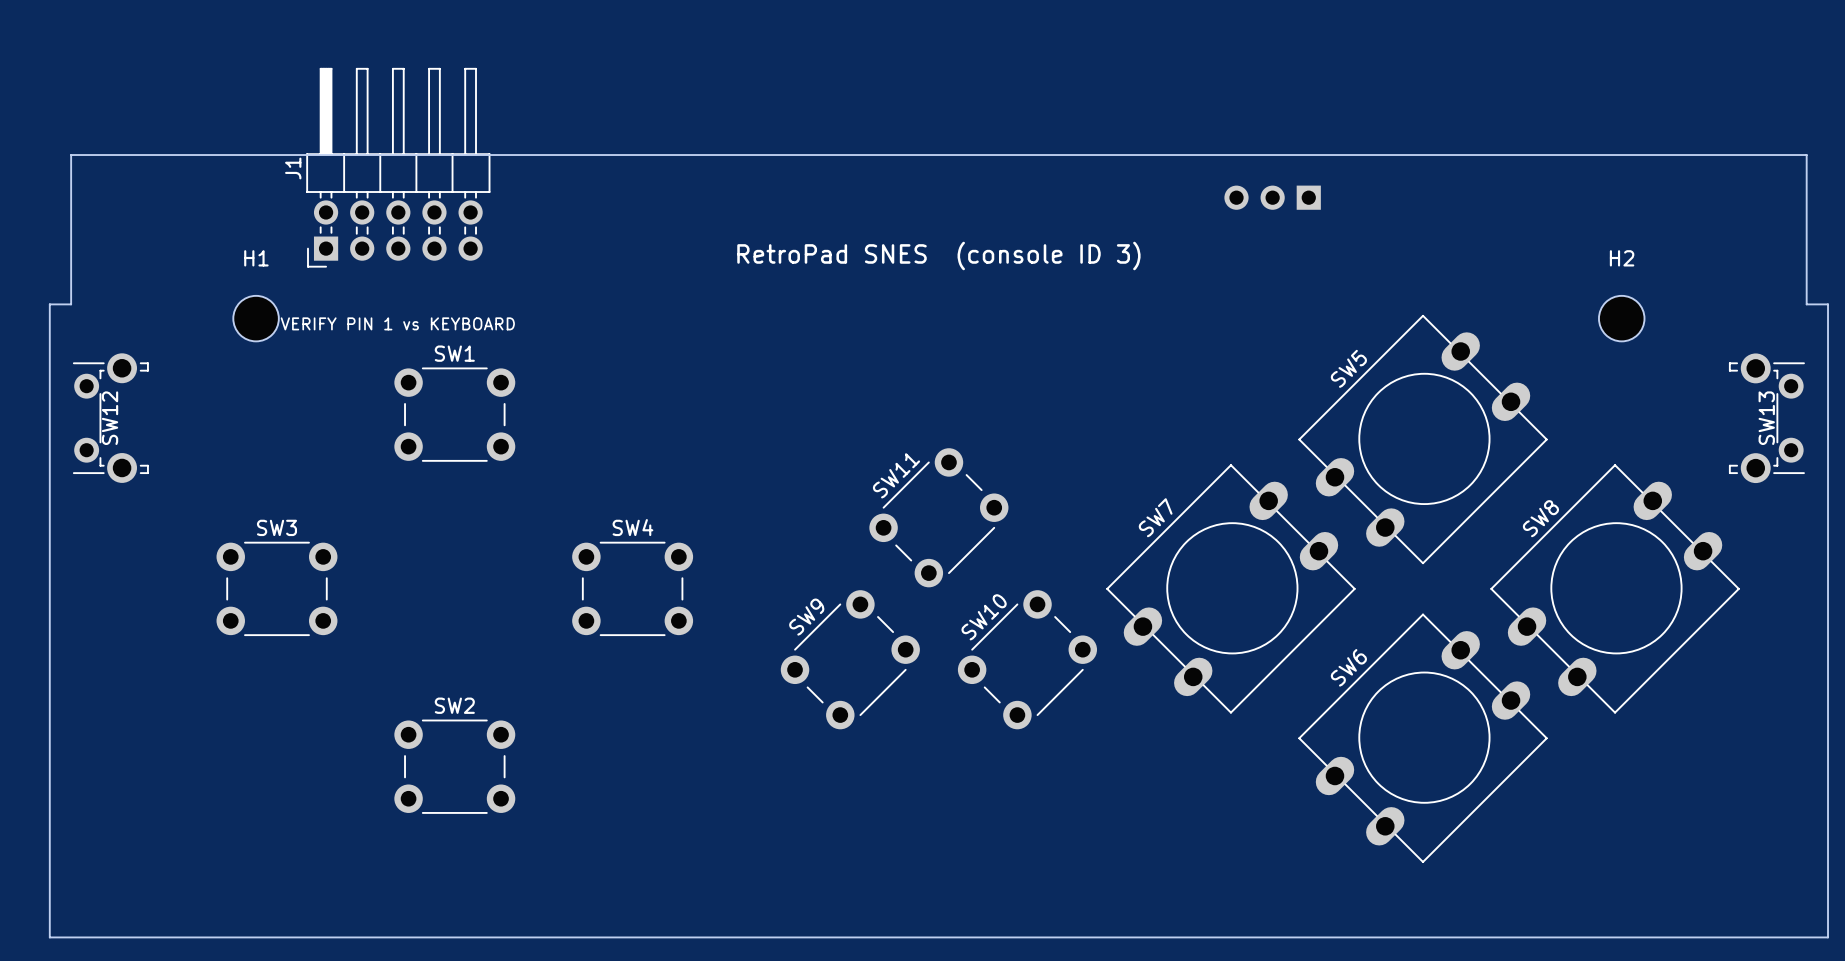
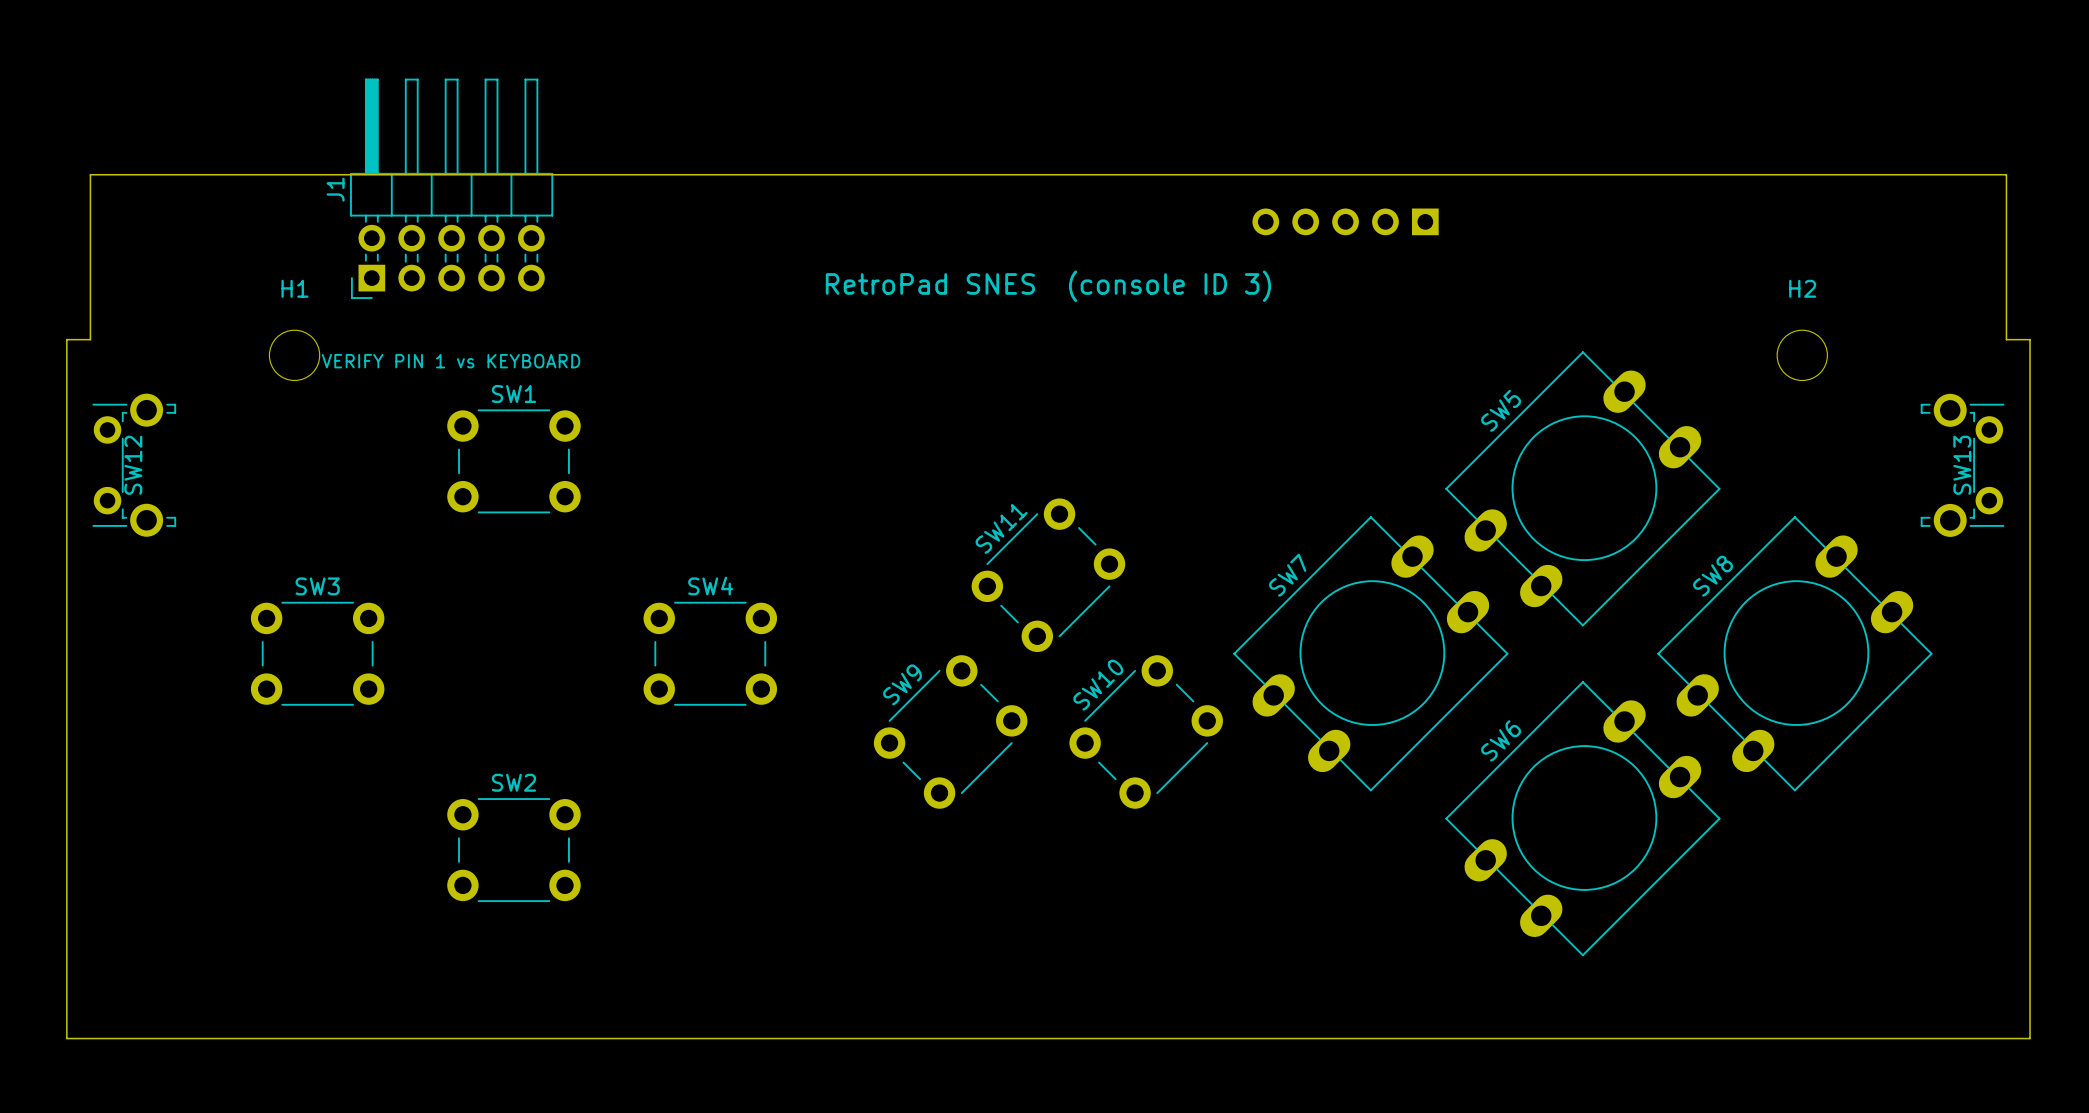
part: none -> (1345, 221)
part: (1272, 197) -> none

